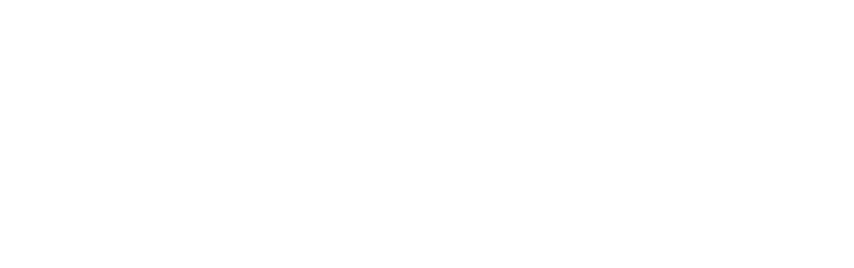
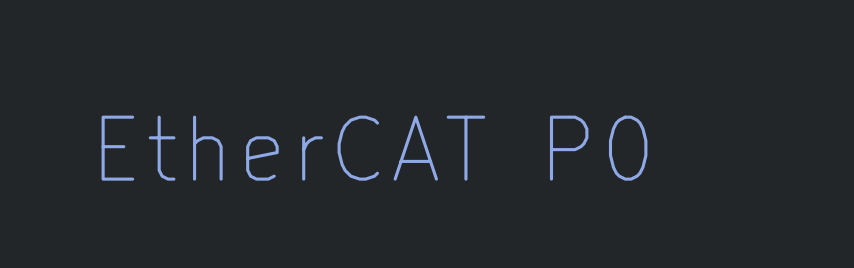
text: none -> EtherCAT P0 (374, 148)

